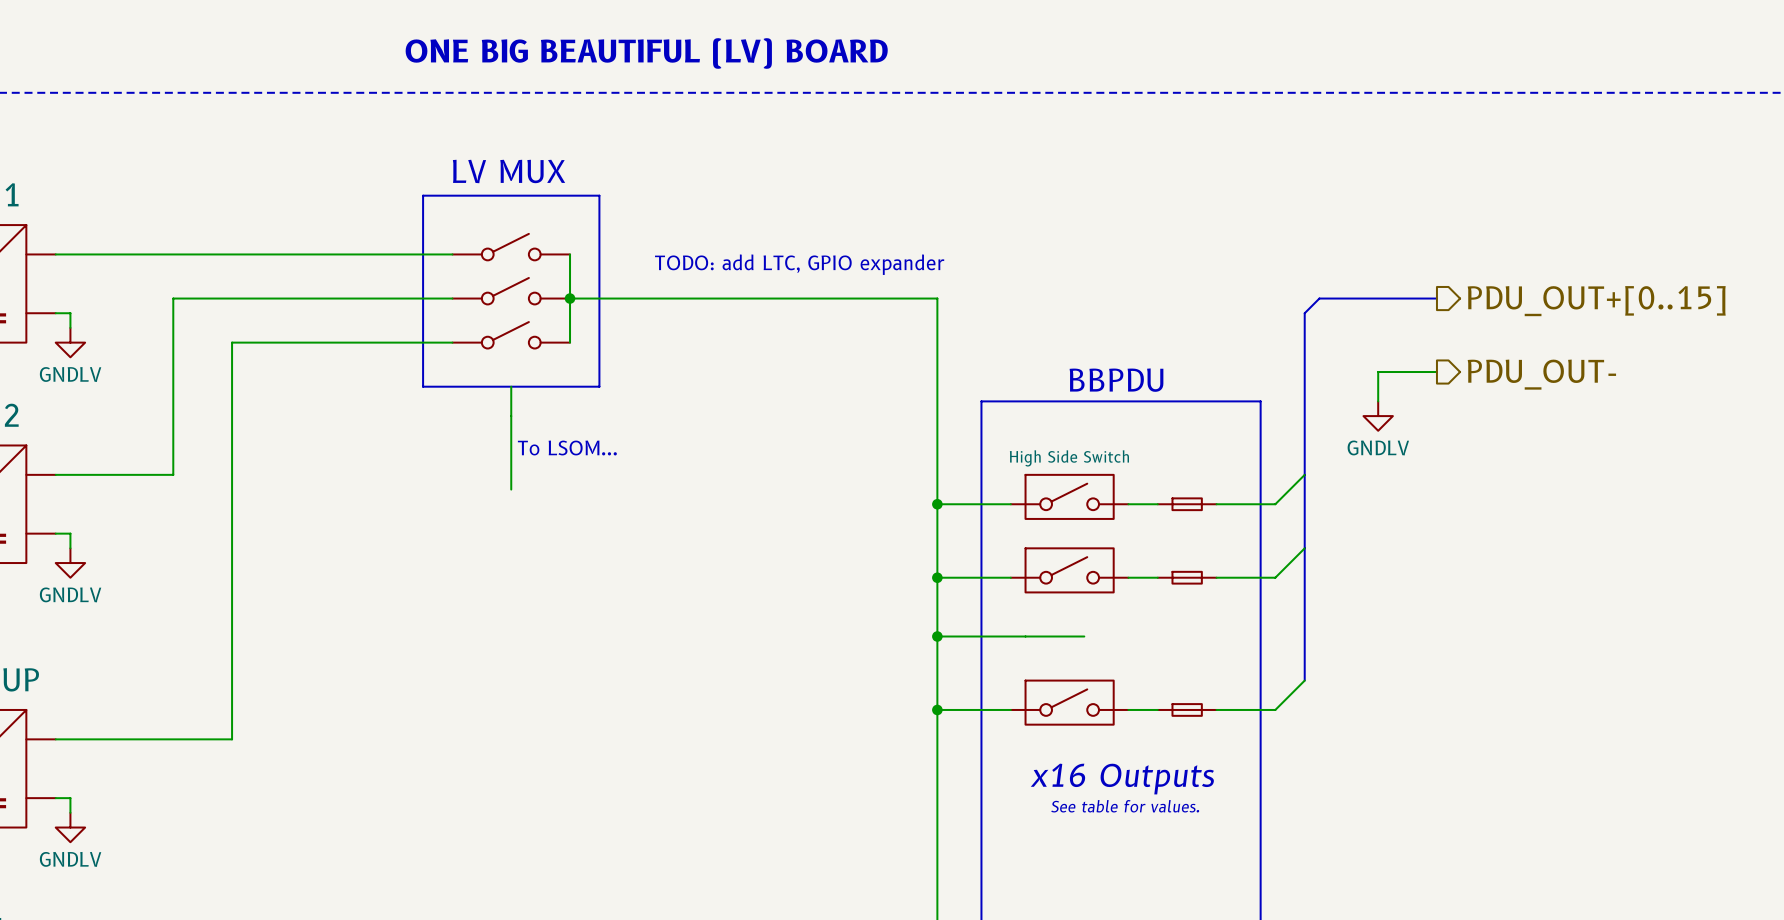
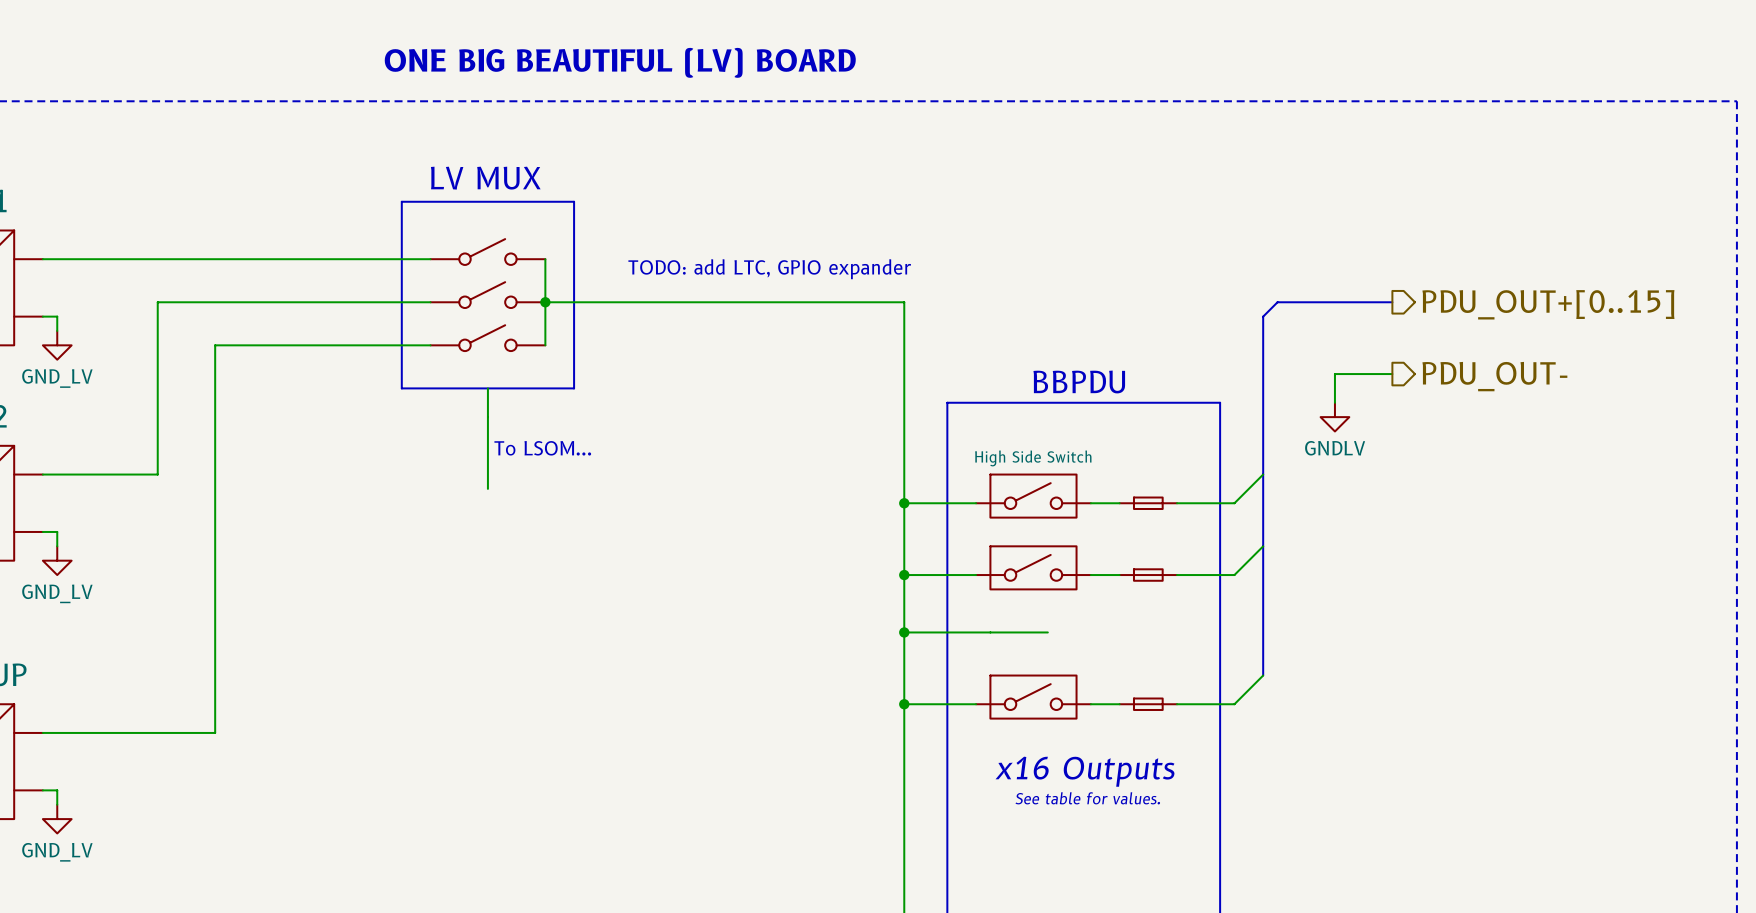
power symbol: GNDLV (70, 342) -> GND_LV (57, 345)
power symbol: GNDLV (70, 563) -> GND_LV (57, 560)
power symbol: GNDLV (70, 827) -> GND_LV (57, 819)

